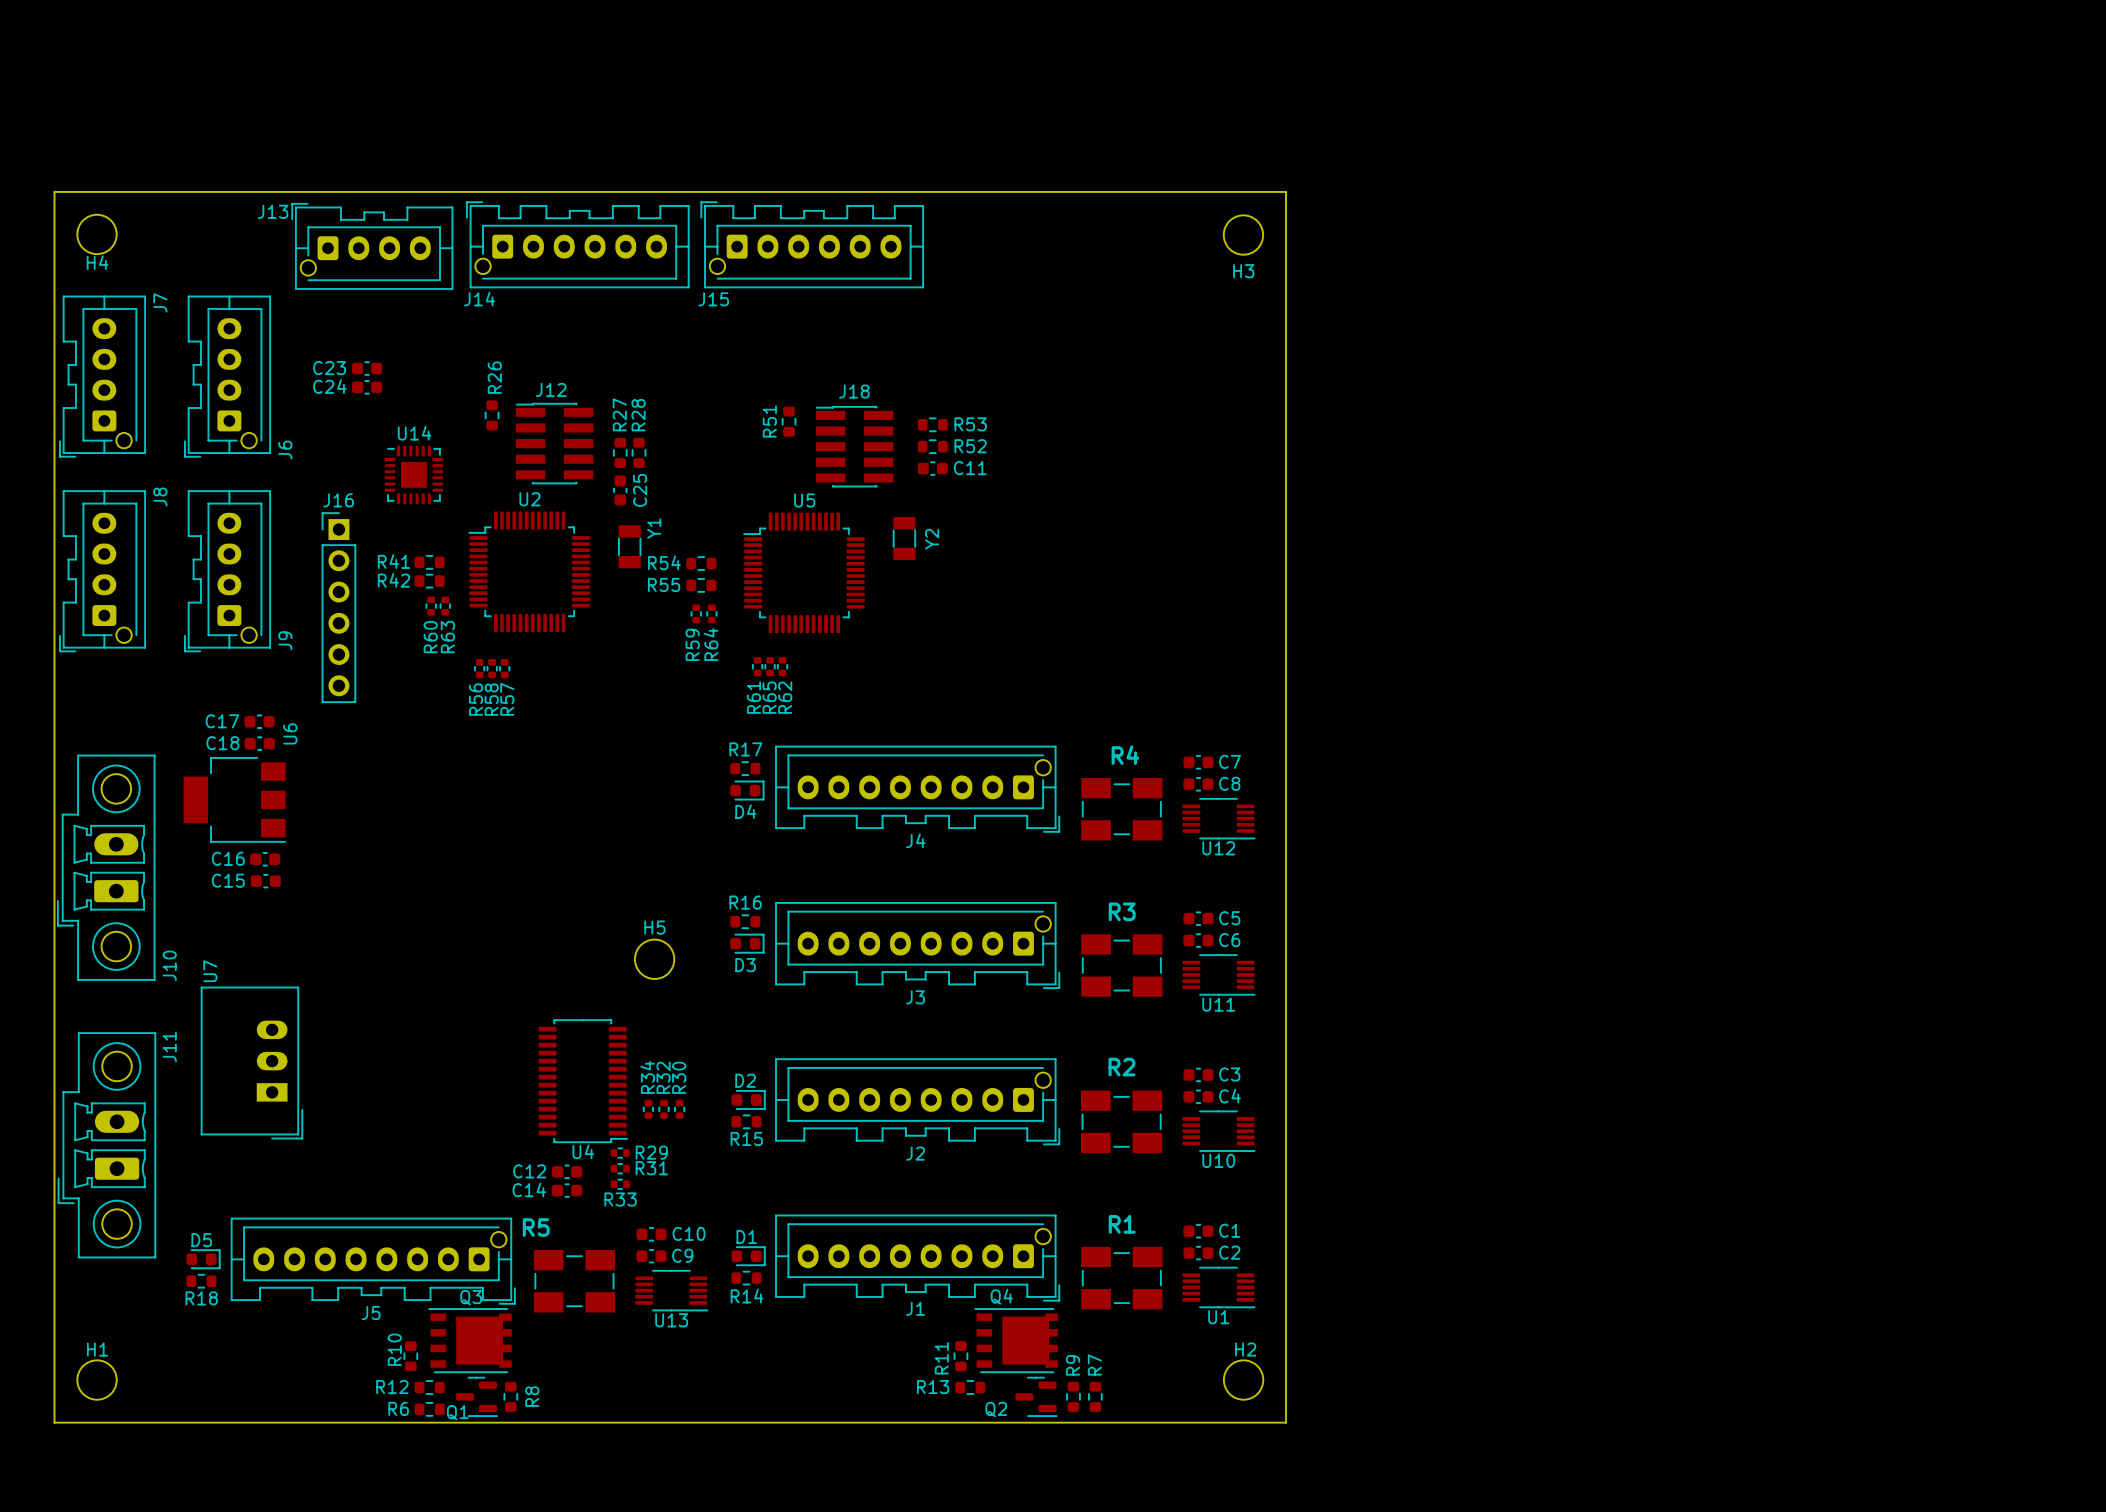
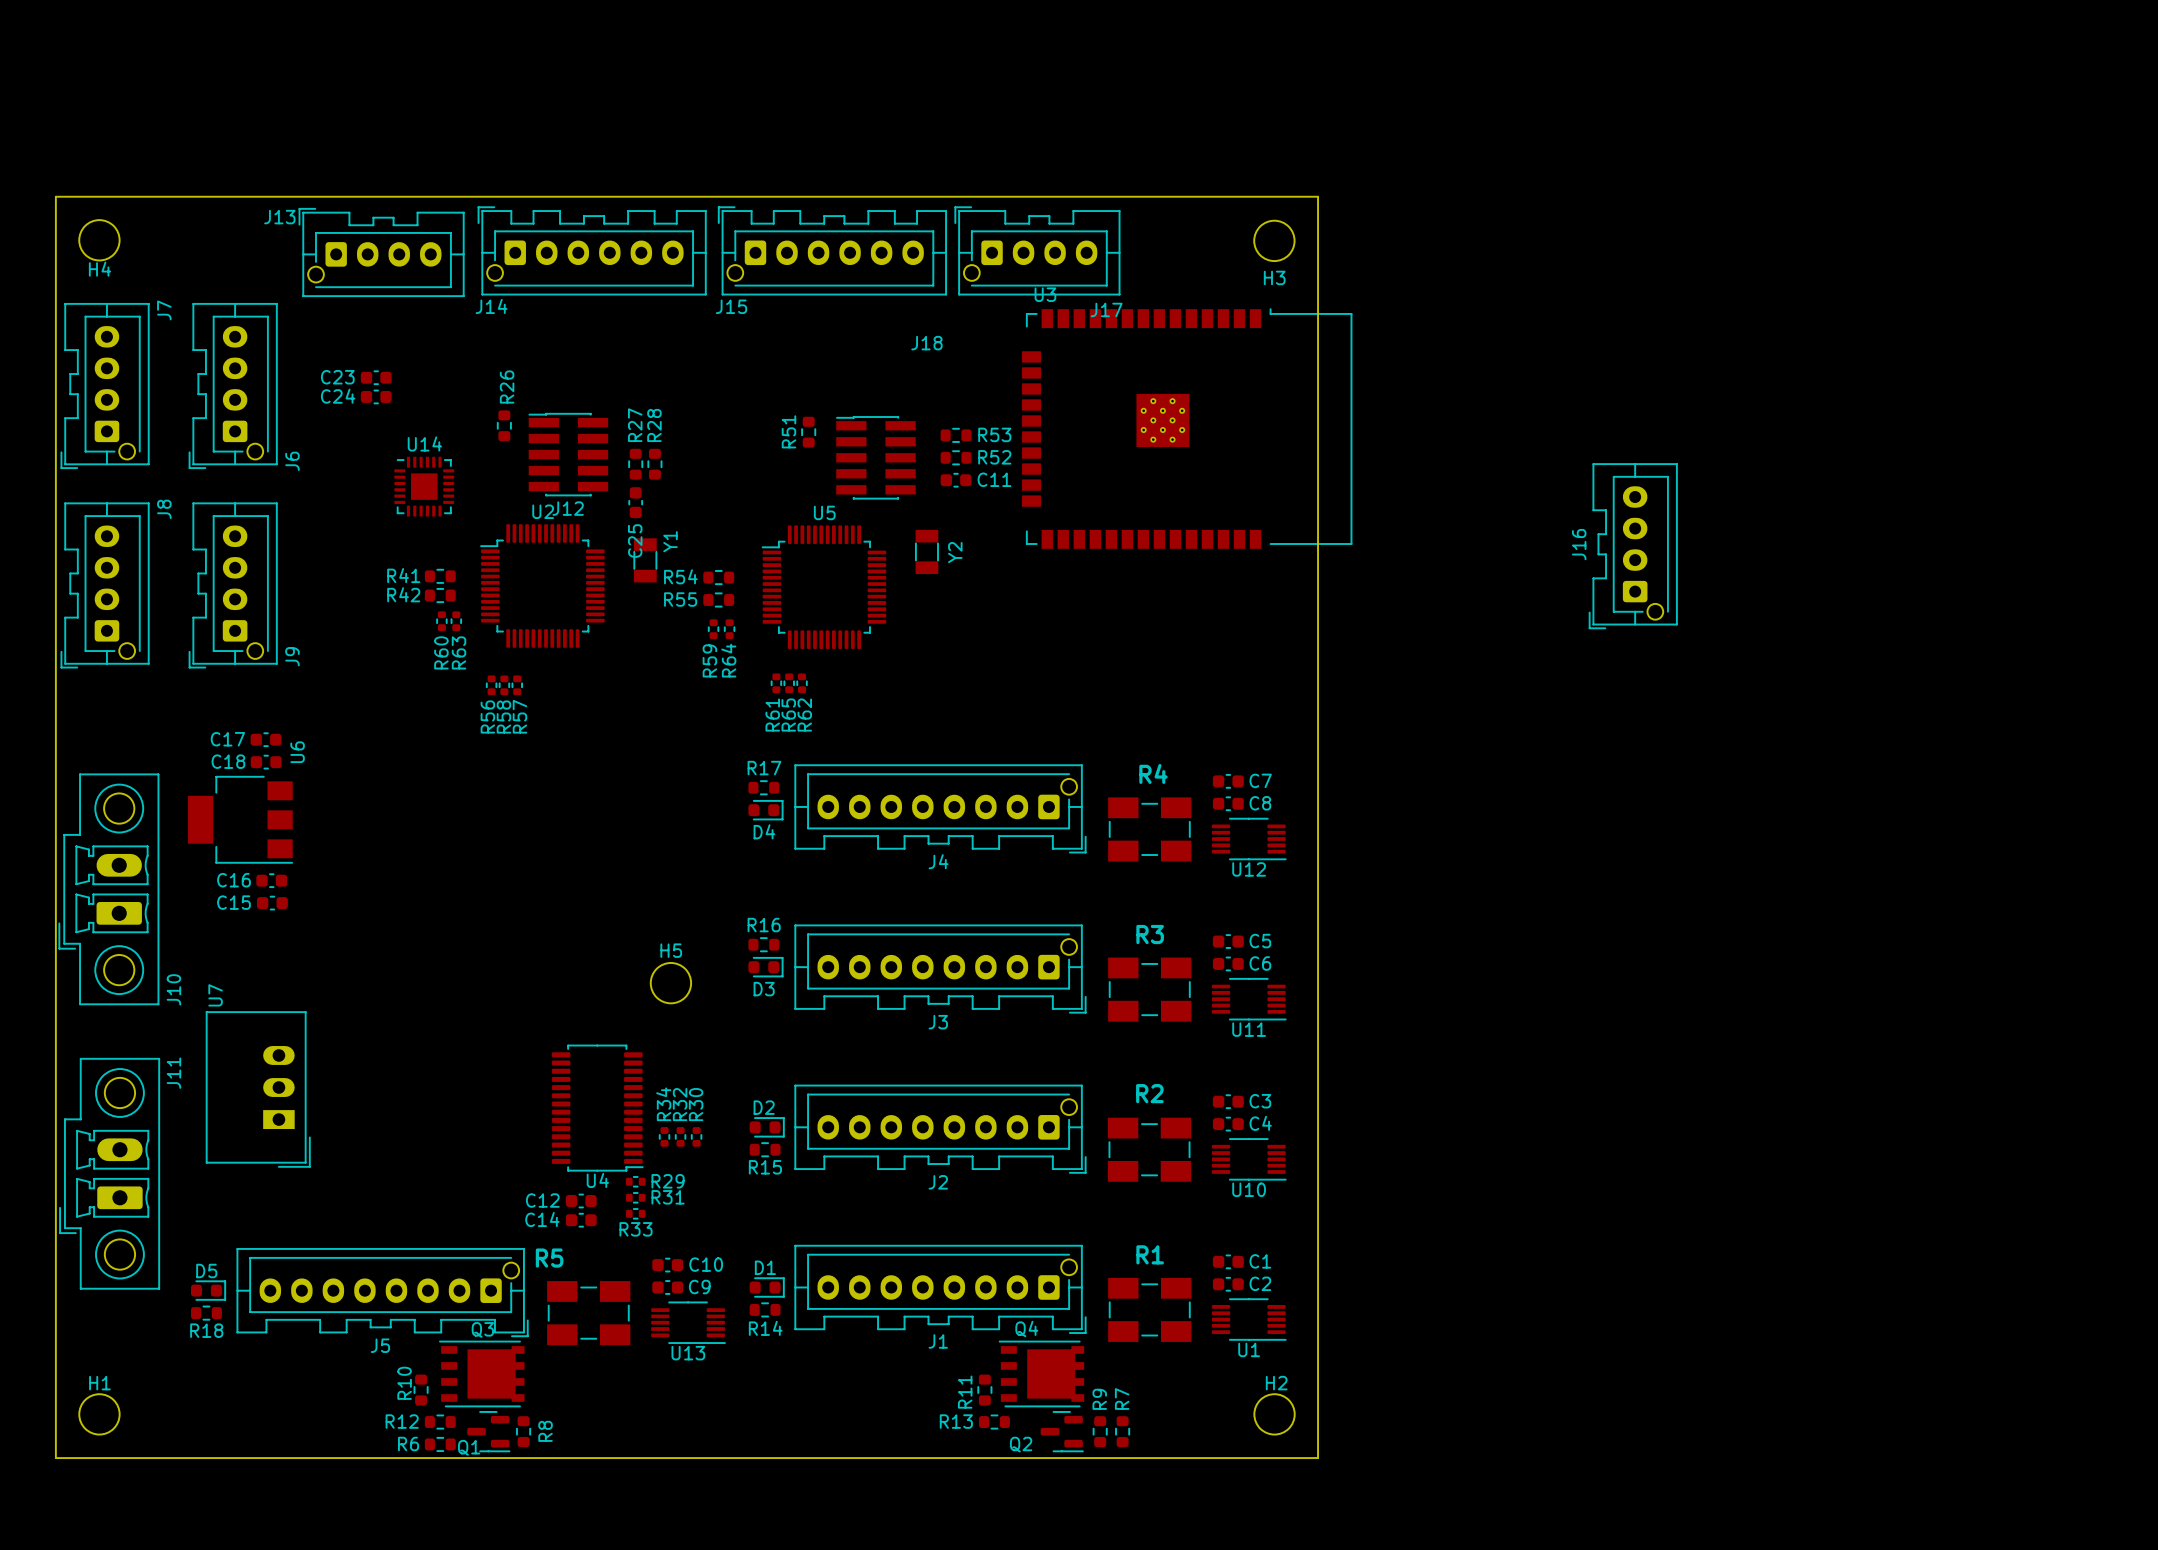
J17: none -> (1037, 250)
J12 name position: J12 (551, 389) -> J12 (568, 508)
J18 name position: J18 (854, 391) -> J18 (926, 343)
U3: none -> (1187, 428)
C25 name position: C25 (640, 490) -> C25 (635, 541)
J16 name position: J16 (338, 500) -> J16 (1579, 544)
J16 footprint: [321, 512, 357, 703] -> [1588, 463, 1678, 630]

